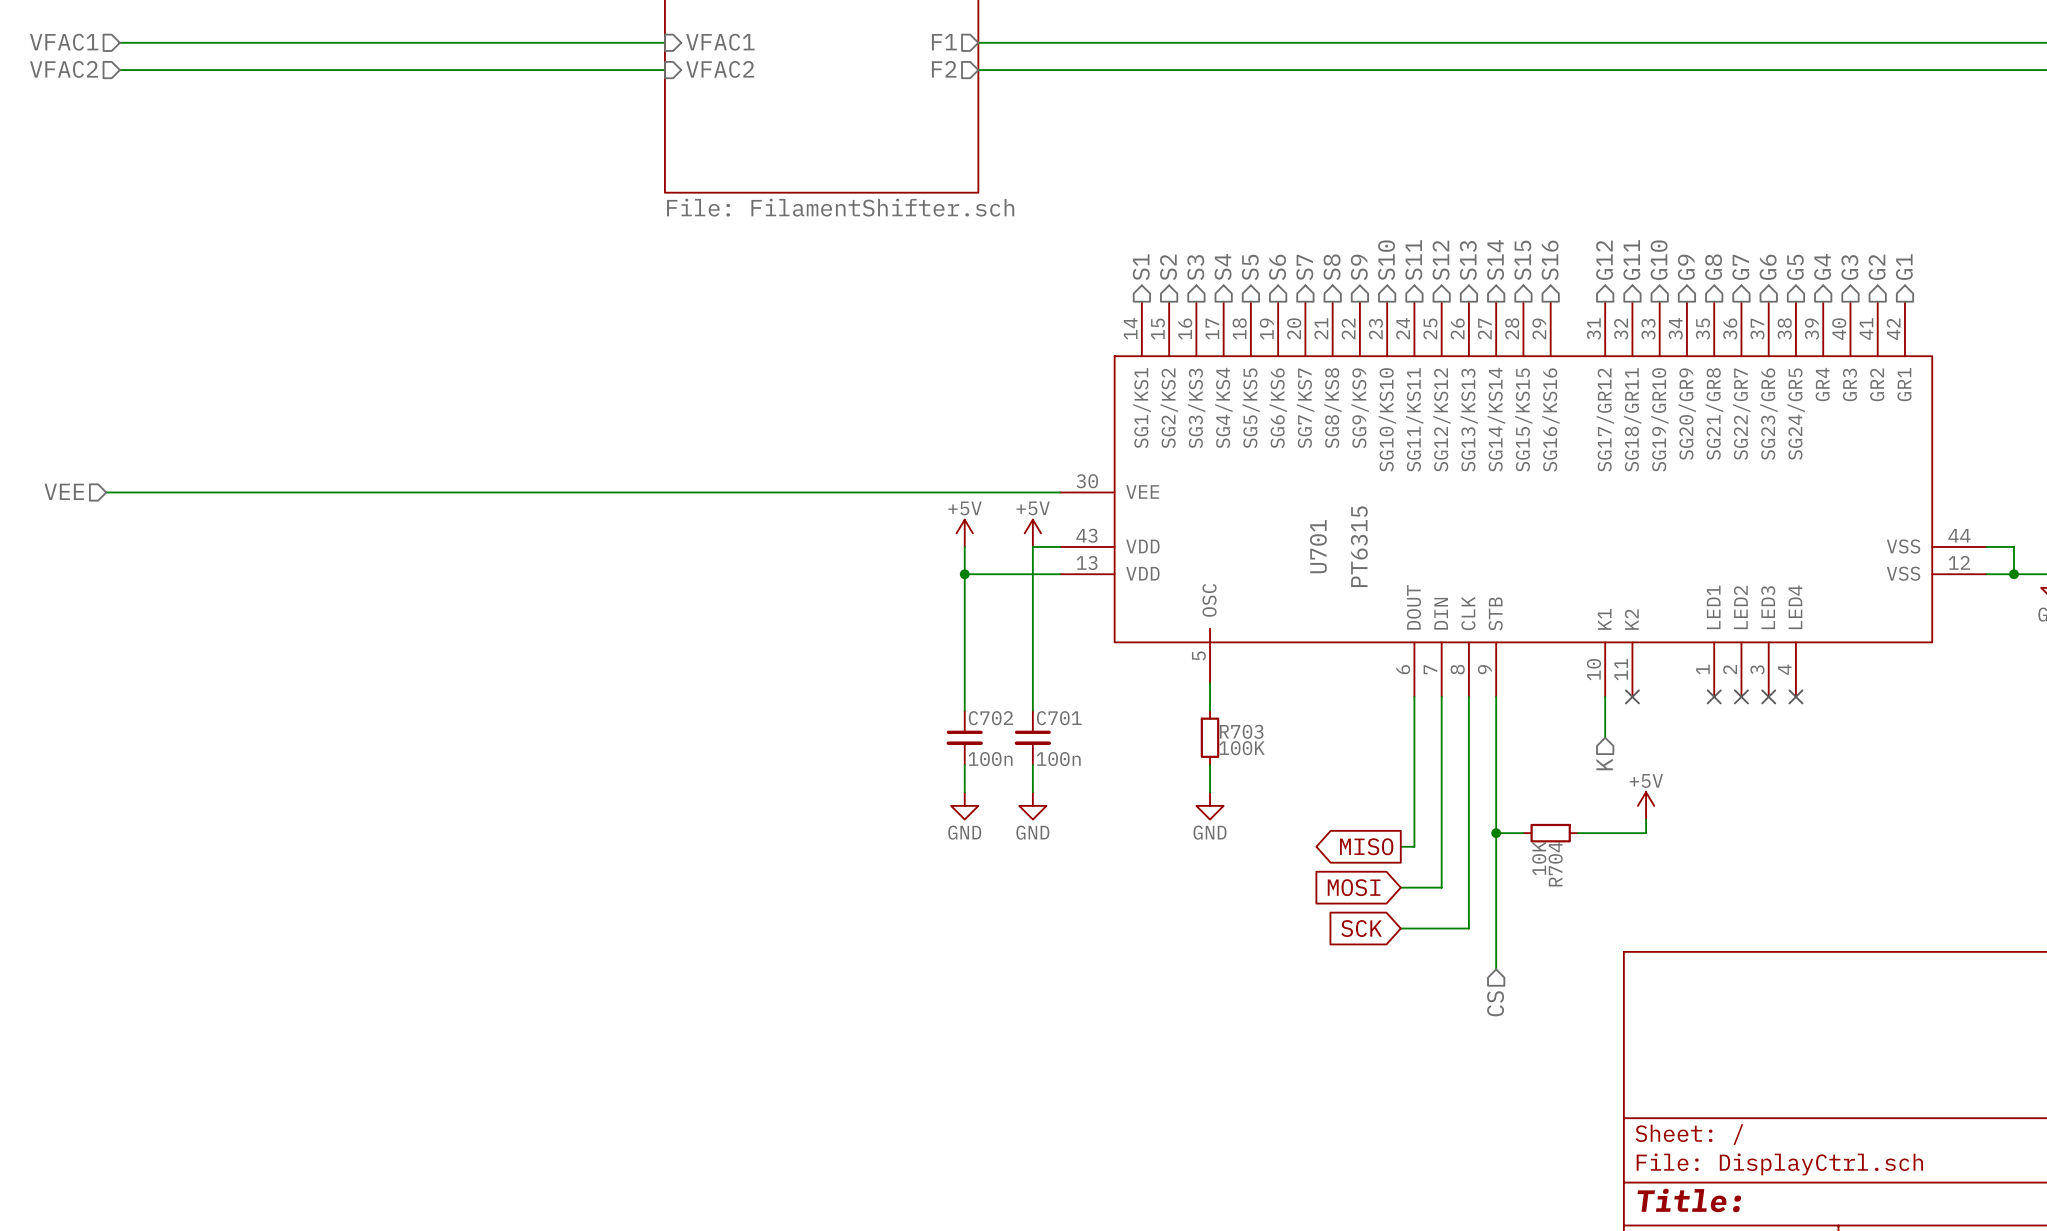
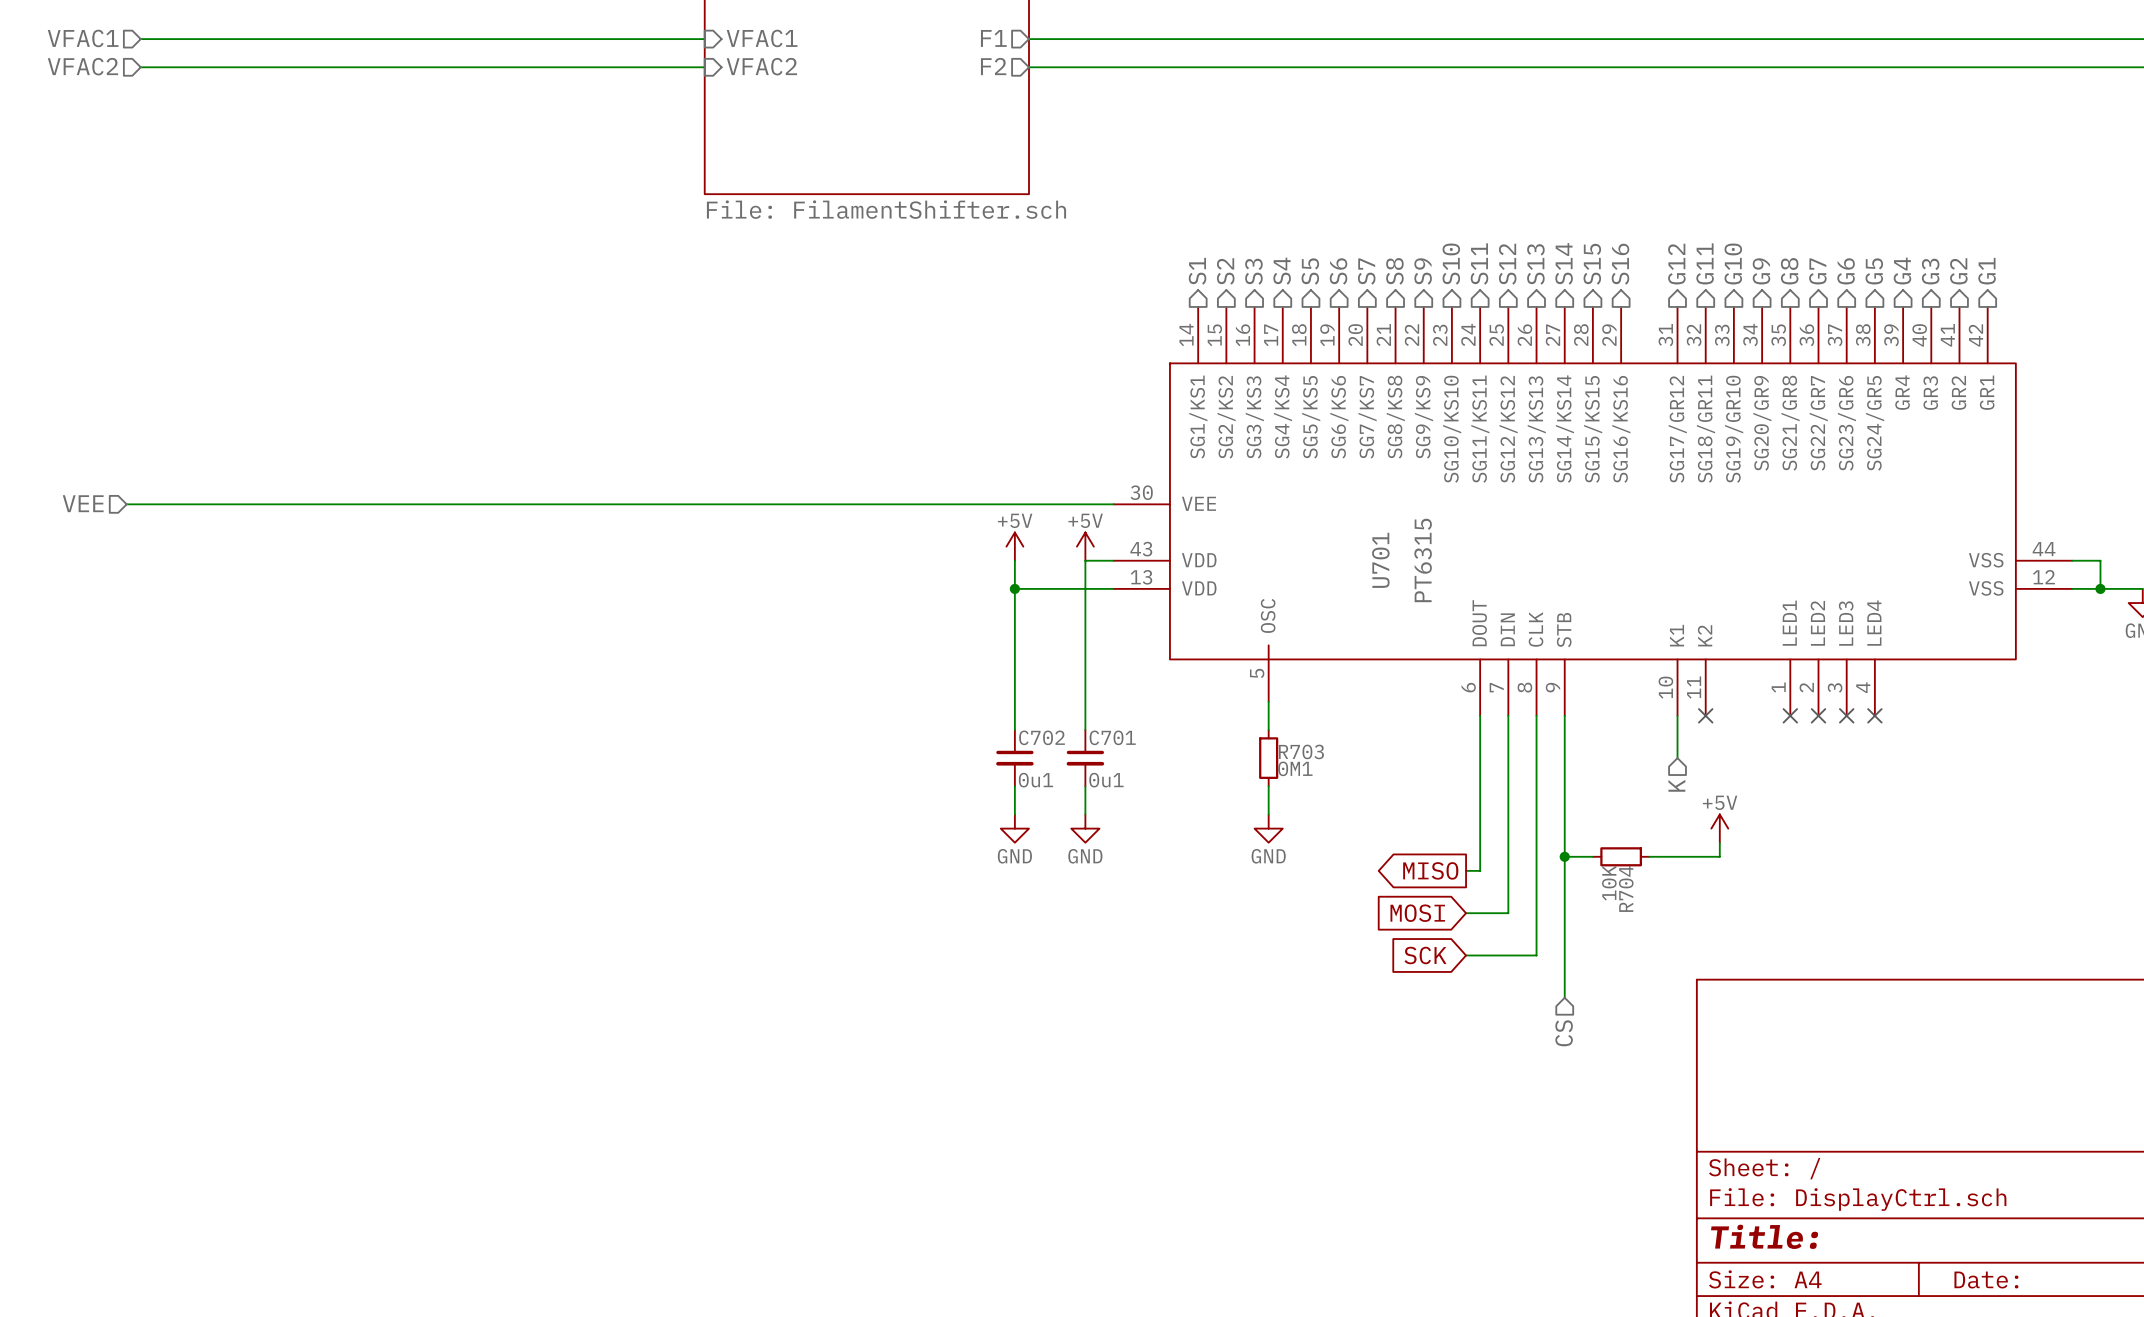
R703 value: 100K (1241, 748) -> 0M1 (1295, 768)
C702 value: 100n (990, 759) -> 0u1 (1035, 780)
C701 value: 100n (1058, 759) -> 0u1 (1106, 780)

